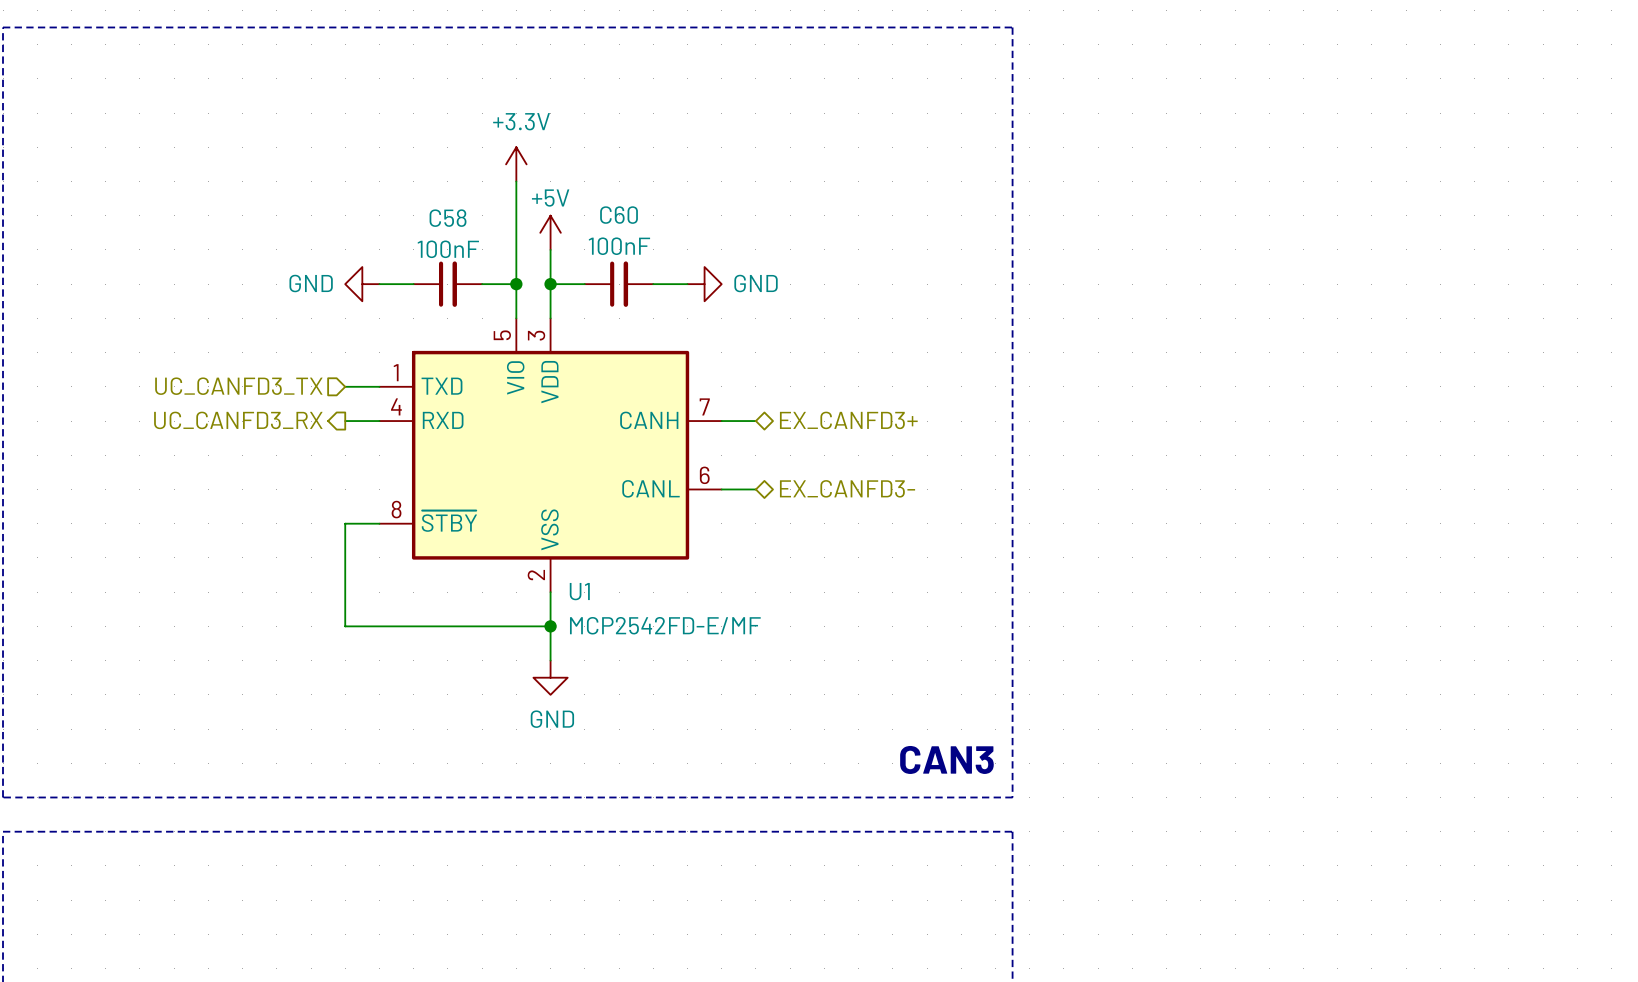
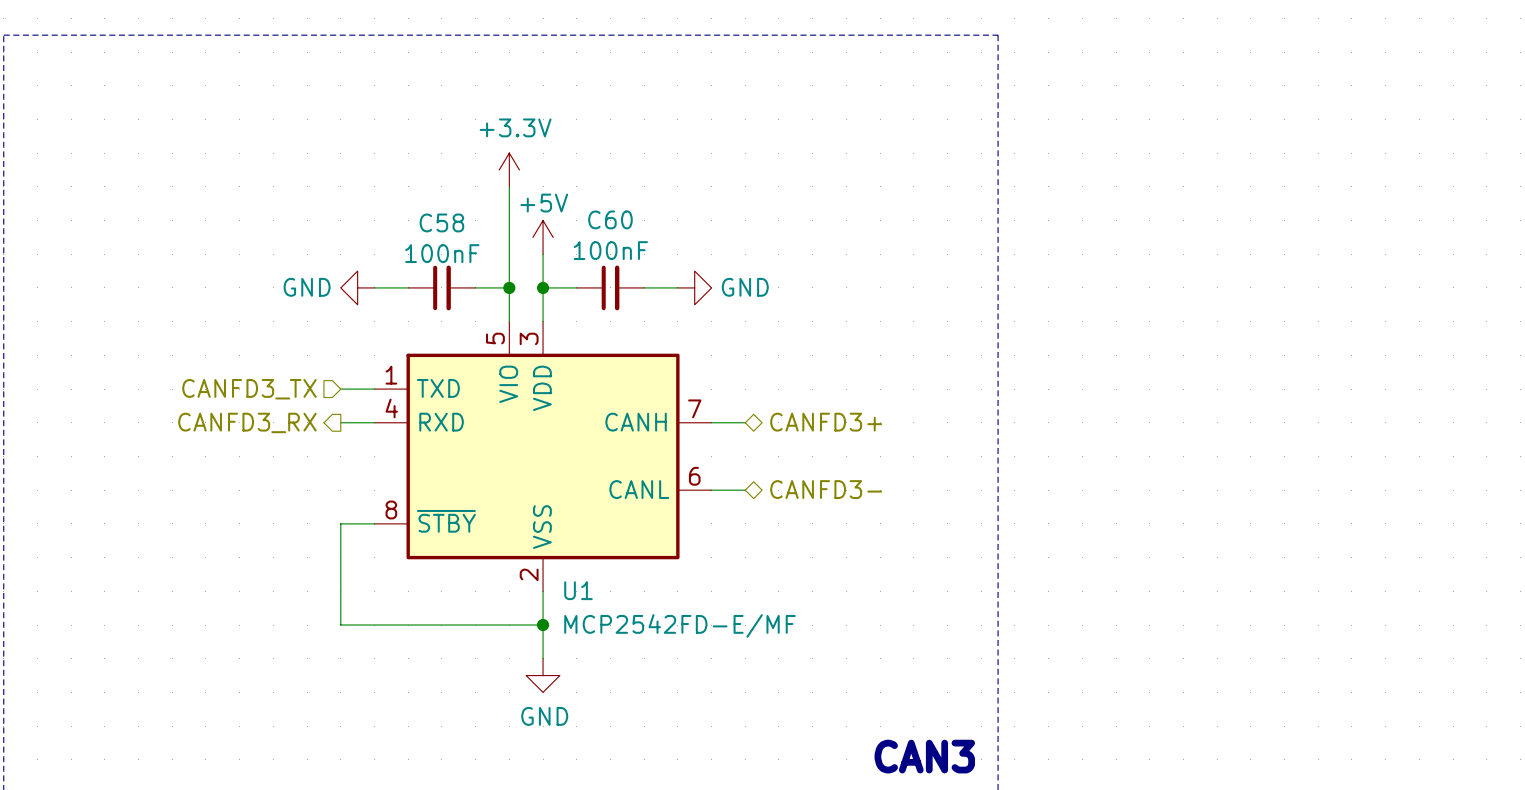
hierarchical label: UC_CANFD3_TX (238, 386) -> CANFD3_TX (249, 389)
hierarchical label: UC_CANFD3_RX (238, 420) -> CANFD3_RX (247, 422)
hierarchical label: EX_CANFD3+ (848, 420) -> CANFD3+ (826, 422)
hierarchical label: EX_CANFD3- (847, 488) -> CANFD3- (826, 489)

